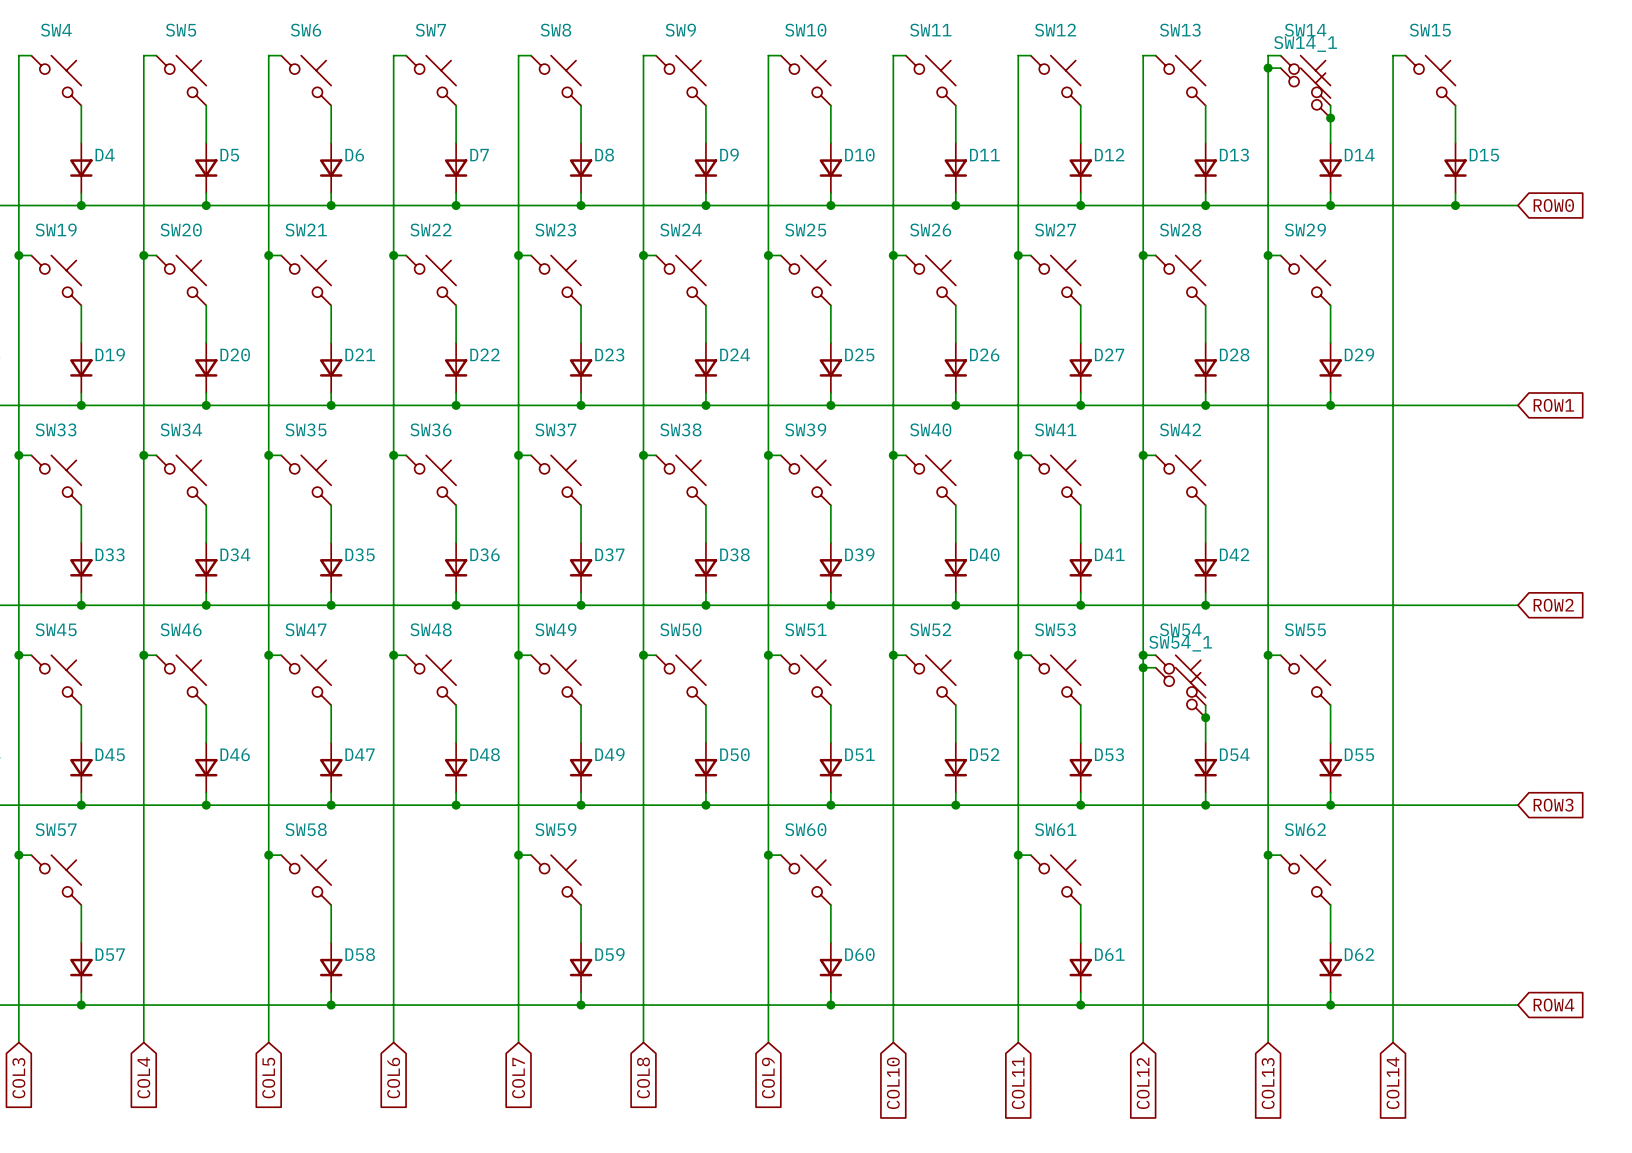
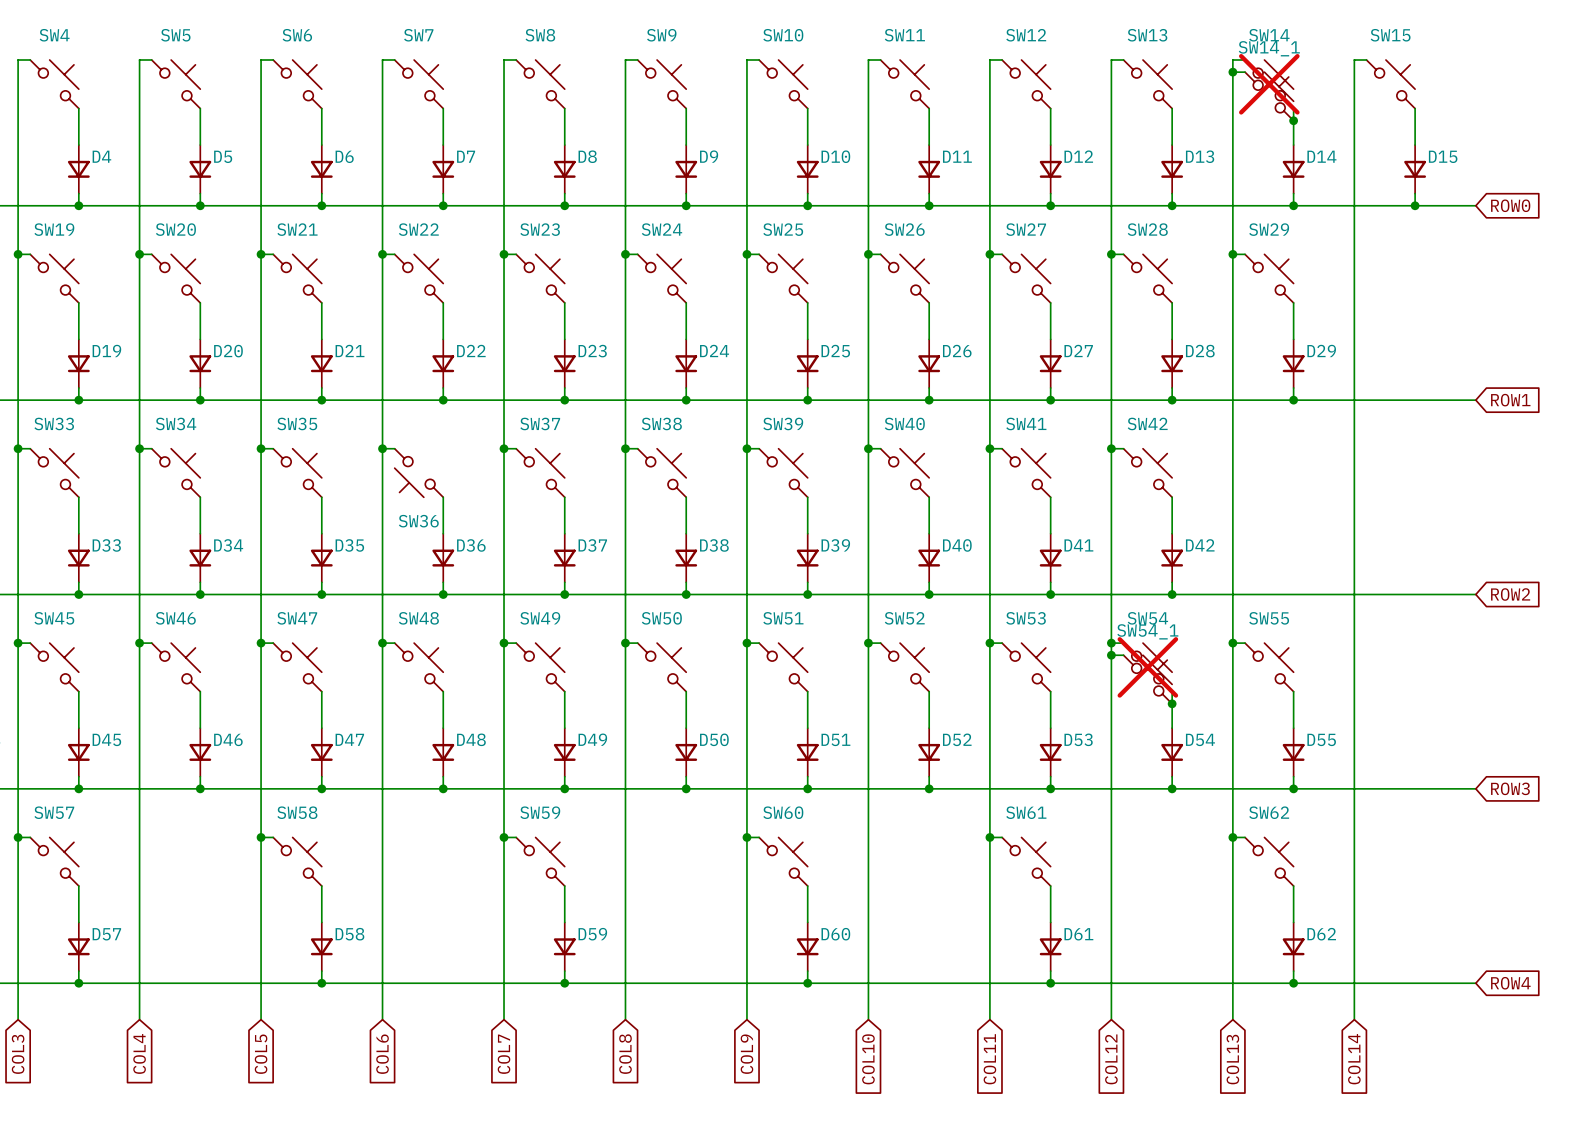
SW14 do-not-place cross: none -> (1269, 84)
SW36 rotation: 0° (431, 480) -> 180° (418, 473)
SW54 do-not-place cross: none -> (1147, 667)

